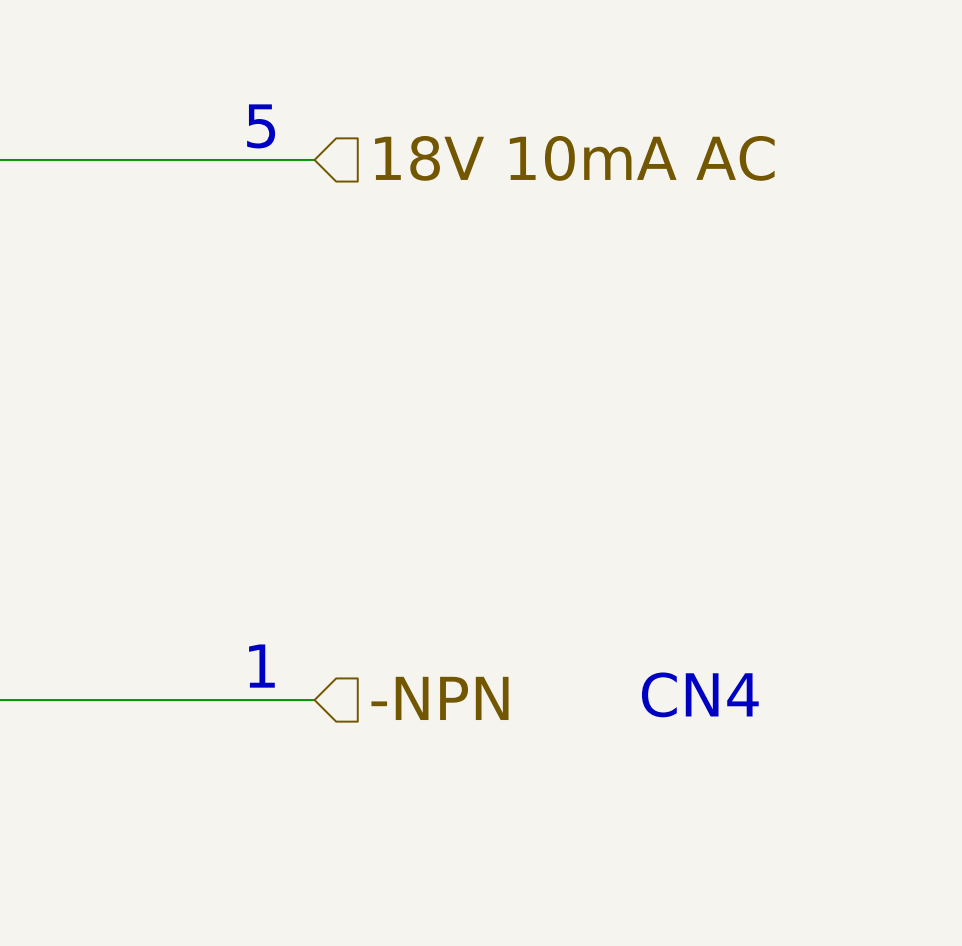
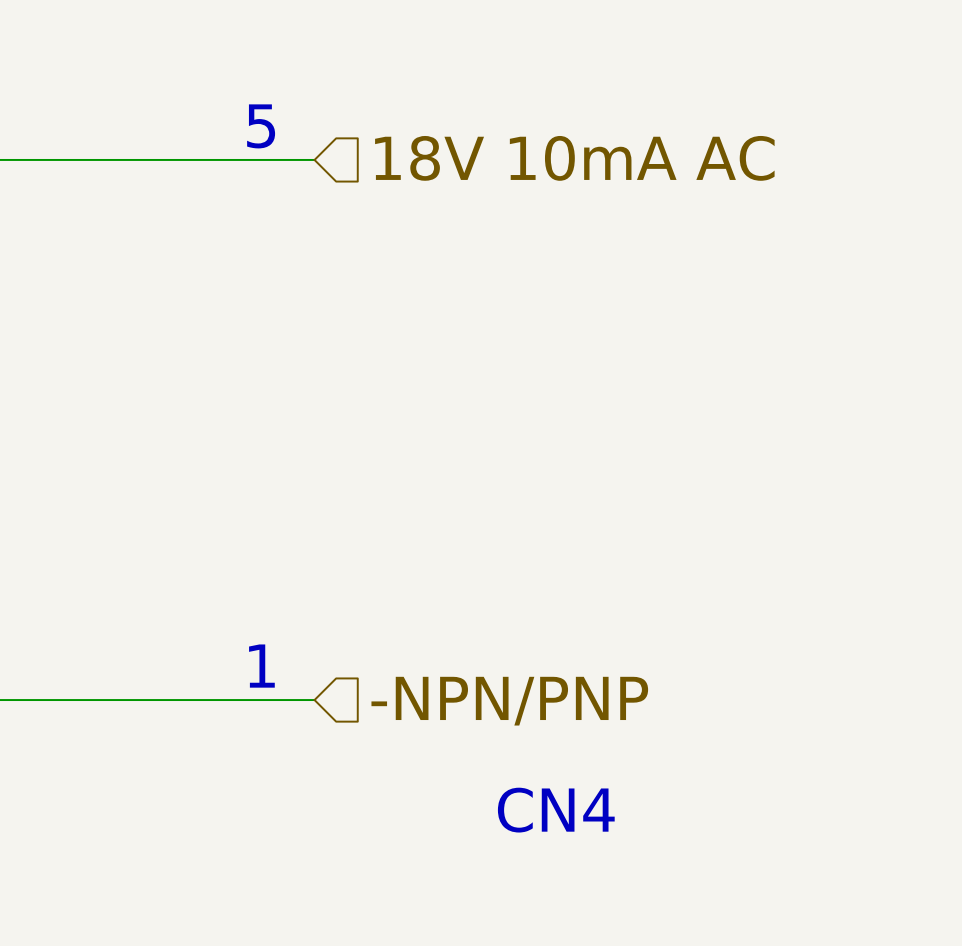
text position: CN4 (700, 694) -> CN4 (556, 810)
hierarchical label: -NPN (440, 698) -> -NPN/PNP (509, 701)

